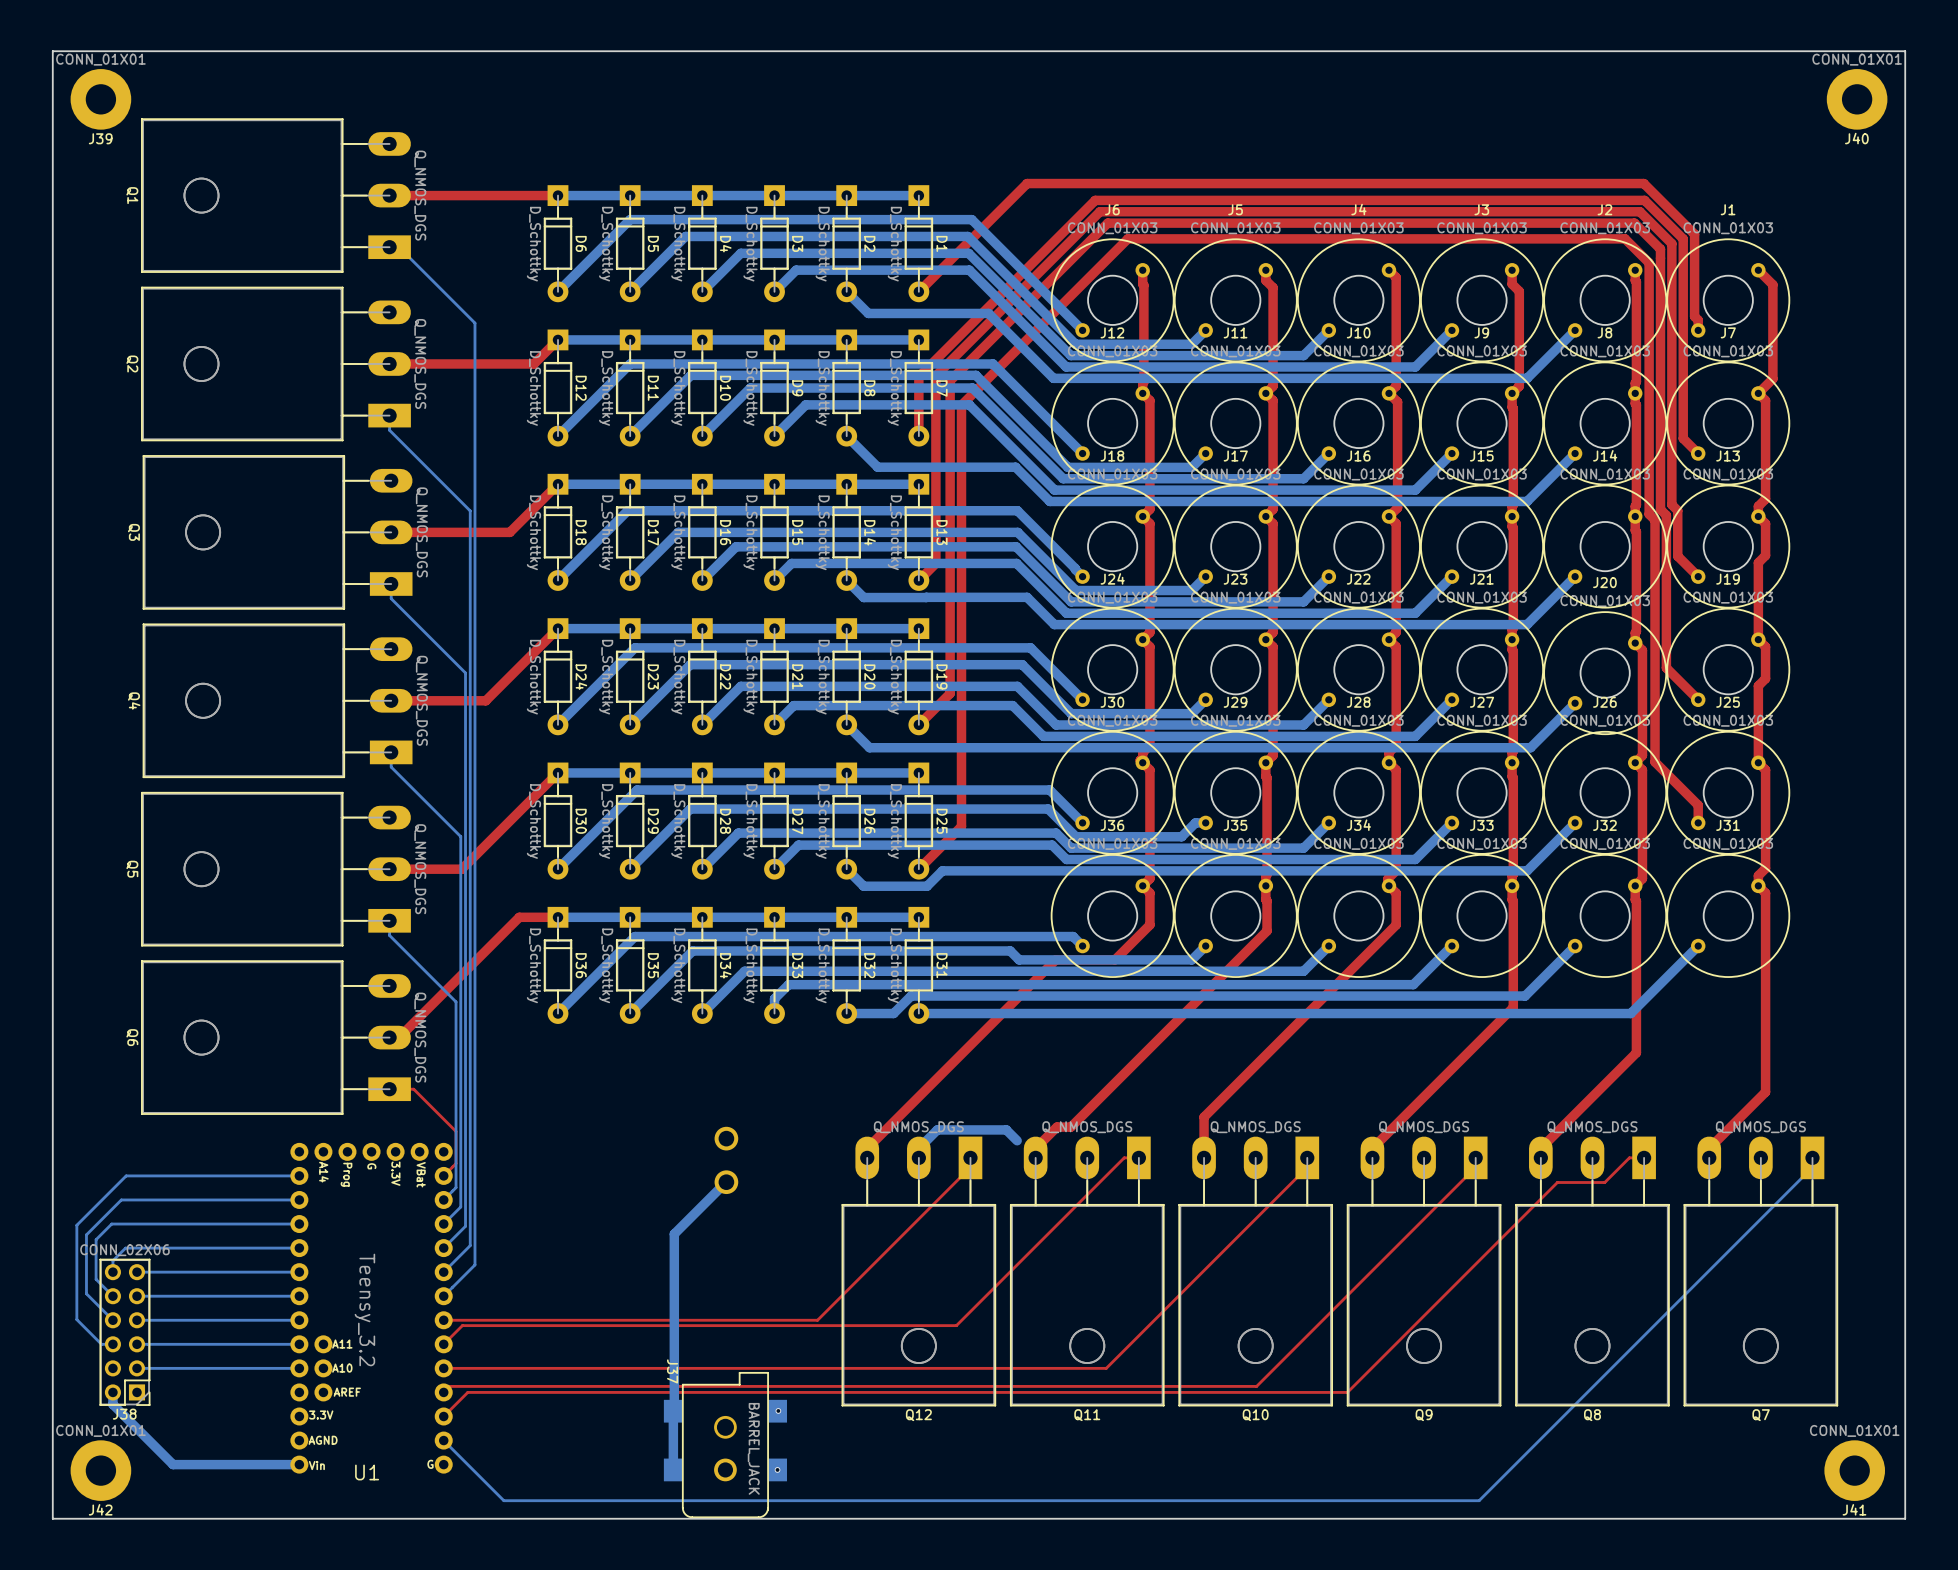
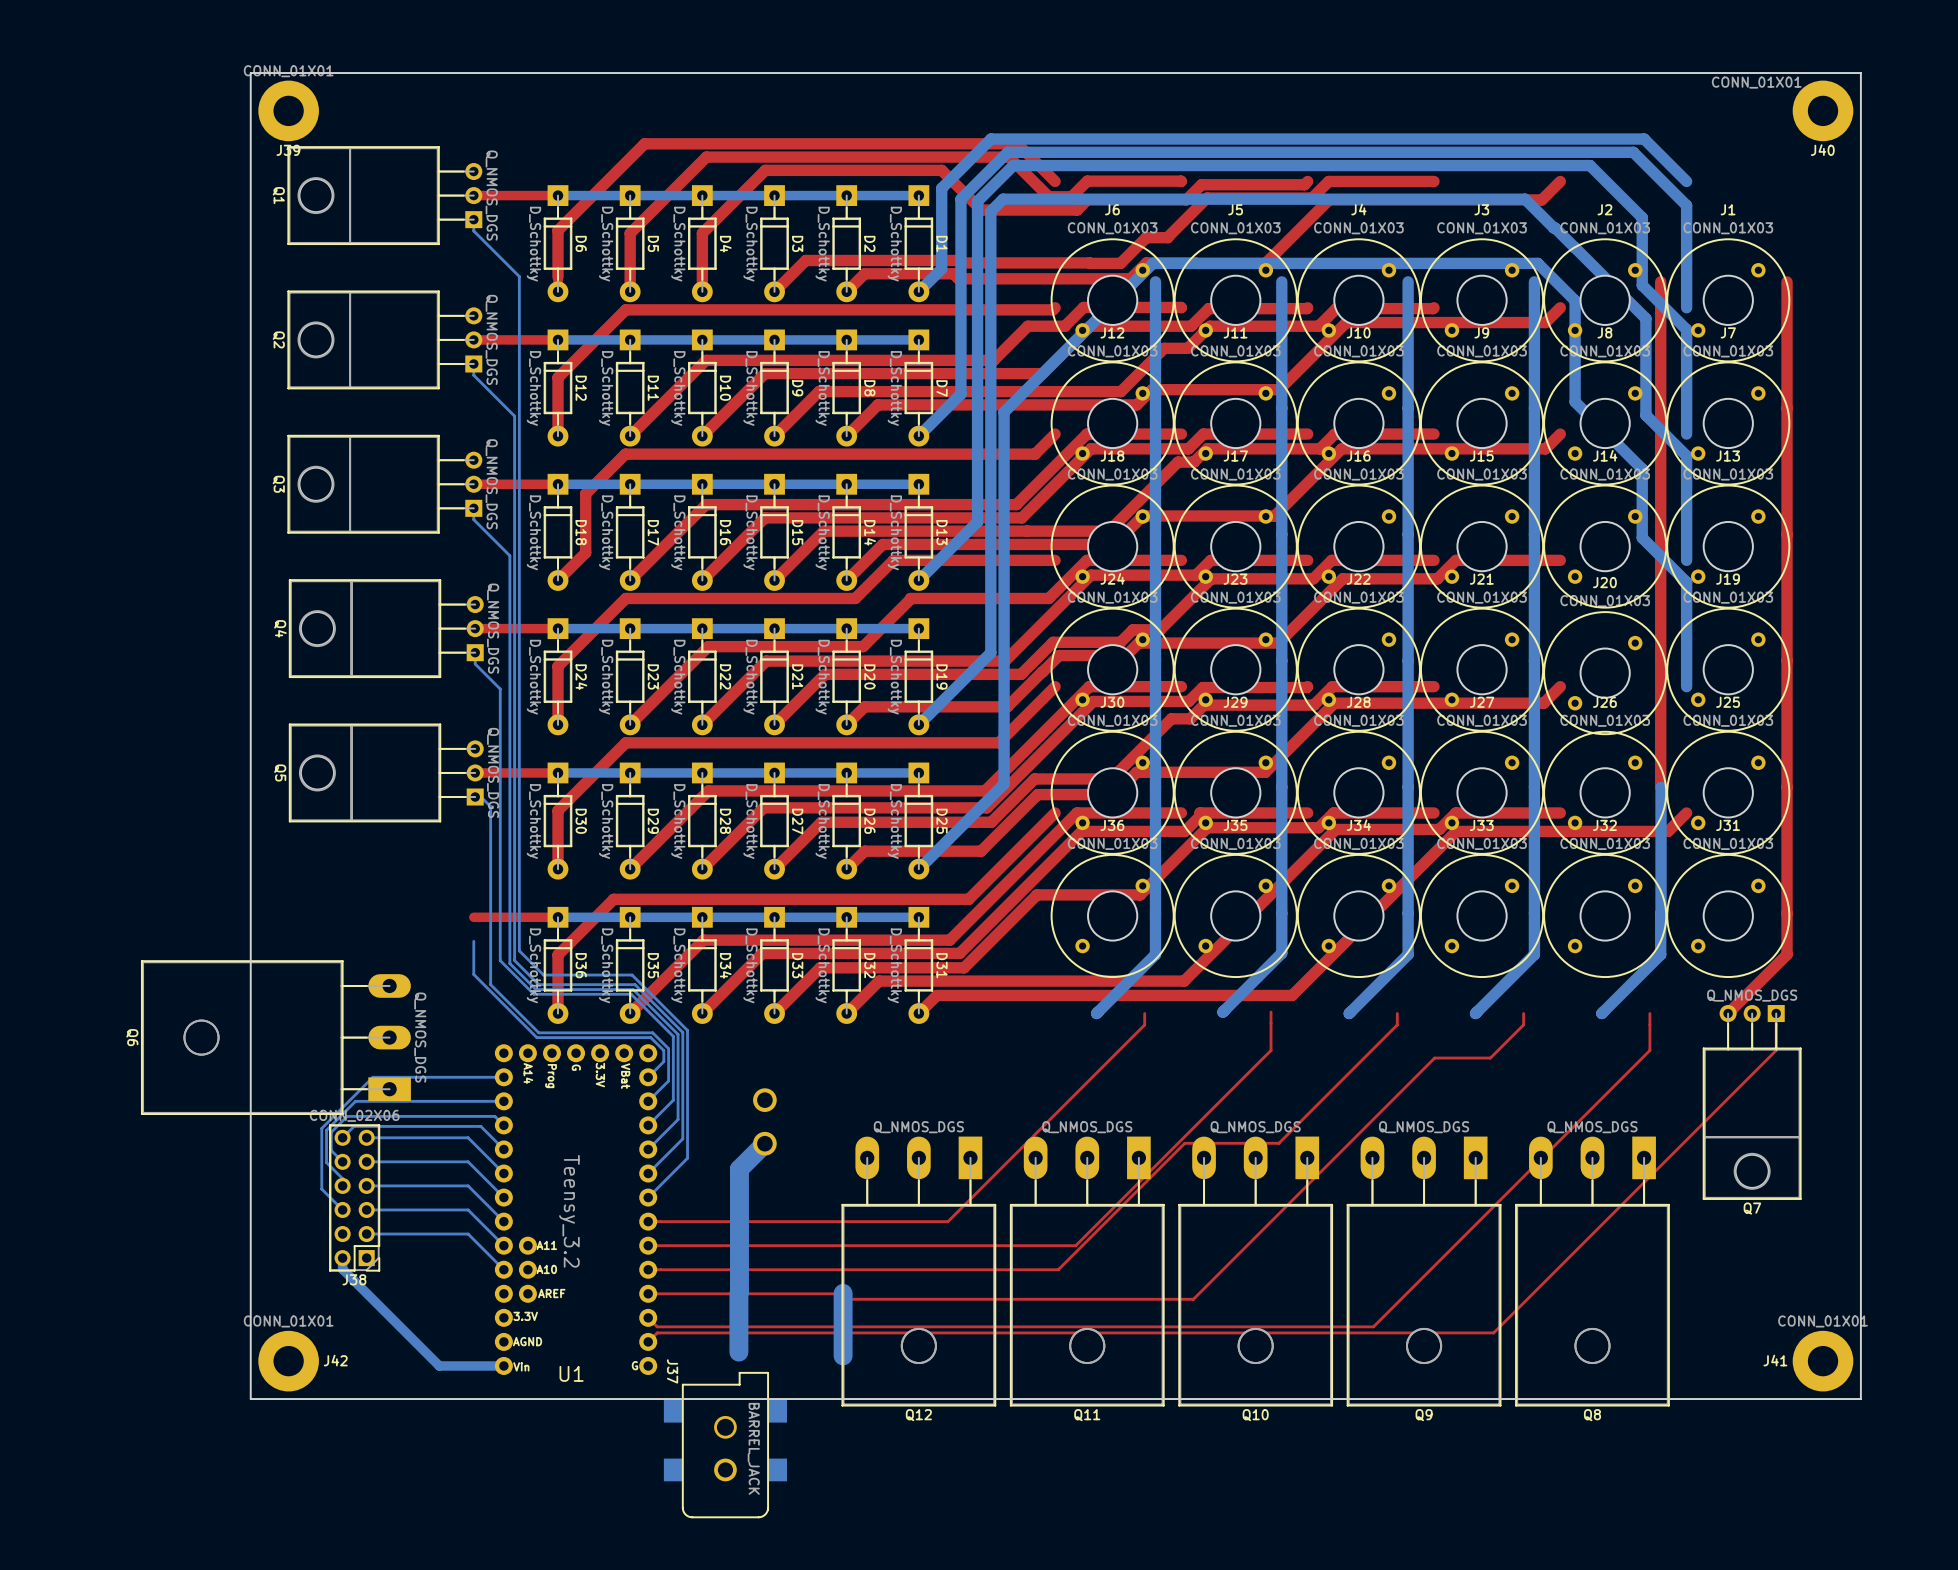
board edge: (1905, 51) (52, 51) (52, 1518) (1905, 1518) (1905, 51) -> (1860, 73) (1860, 1399) (250, 1399) (250, 73) (1860, 73)
J40 value position: CONN_01X01 (1857, 59) -> CONN_01X01 (1756, 82)
J39 position: (100, 99) -> (288, 110)
J40 position: (1857, 99) -> (1823, 110)
Q1 footprint: [141, 118, 411, 273] -> [287, 146, 483, 245]
top track: none -> (1055, 181) (1017, 143) (644, 143) (558, 230) (558, 291)
top track: none -> (1181, 181) (1087, 181) (1071, 196) (1048, 196) (1009, 157) (706, 157) (630, 233) (630, 291)
top track: none -> (1307, 181) (1304, 184) (1201, 184) (1186, 199) (1087, 199) (1077, 210) (981, 210) (941, 170) (765, 170) (702, 233) (702, 291)
top track: none -> (1434, 181) (1328, 181) (1312, 198) (1207, 198) (1167, 237) (1146, 237) (1120, 263) (805, 260) (774, 291)
top track: none -> (1560, 181) (1541, 199) (1329, 199) (1265, 263) (1146, 262) (1130, 278) (958, 278) (953, 273) (864, 273) (846, 291)
bottom track: none -> (1686, 181) (1644, 139) (991, 139) (941, 188) (941, 268) (918, 291)
Q1 name position: Q1 (132, 195) -> Q1 (278, 195)
Q1 value position: Q_NMOS_DGS (420, 195) -> Q_NMOS_DGS (491, 195)
top track: (473, 195) (389, 195) -> none
bottom track: none -> (473, 219) (473, 231) (519, 276) (519, 950) (543, 975) (632, 975) (687, 1030) (687, 1158) (648, 1197)
bottom track: (389, 247) (399, 247) (474, 323) (474, 1264) (443, 1296) -> none
bottom track: none -> (1574, 247) (1525, 199) (1003, 199) (990, 211) (990, 652) (918, 724)
bottom track: none -> (1575, 247) (1645, 318) (1645, 415) (1686, 455) (1686, 560)
top track: (1142, 270) (1142, 393) (1149, 400) (1149, 509) (1142, 516) (1149, 523) (1149, 632) (1142, 639) (1149, 646) (1149, 745) (1142, 752) (1142, 762) -> none
top track: (1265, 270) (1265, 280) (1273, 287) (1273, 386) (1265, 393) (1273, 400) (1273, 509) (1265, 516) (1273, 523) (1273, 632) (1265, 639) (1273, 646) (1273, 755) (1265, 762) (1267, 930) (1070, 1127) (1056, 1127) (1035, 1148) (1035, 1157) -> none
top track: (1388, 270) (1396, 277) (1396, 386) (1388, 393) (1397, 402) (1397, 507) (1388, 516) (1396, 523) (1396, 632) (1388, 639) (1396, 646) (1396, 745) (1388, 752) (1388, 762) (1396, 769) (1396, 870) (1387, 878) (1387, 884) (1396, 893) (1396, 924) (1204, 1117) (1204, 1157) -> none
top track: (1512, 270) (1512, 284) (1519, 291) (1519, 386) (1512, 393) (1513, 1007) (1372, 1148) (1372, 1157) -> none
top track: (1635, 270) (1635, 643) (1642, 650) (1642, 755) (1635, 762) (1642, 769) (1642, 878) (1635, 885) (1636, 1052) (1540, 1148) (1540, 1157) -> none
top track: (1758, 270) (1772, 284) (1772, 378) (1758, 393) (1765, 400) (1765, 499) (1758, 506) (1758, 516) (1765, 523) (1765, 555) (1758, 562) (1758, 639) (1765, 646) (1765, 678) (1758, 685) (1758, 762) (1765, 769) (1765, 868) (1758, 875) (1758, 885) (1765, 893) (1765, 1092) (1709, 1148) (1709, 1157) -> none
bottom track: none -> (1155, 281) (1155, 954) (1096, 1013)
bottom track: none -> (1281, 281) (1281, 953) (1222, 1012)
bottom track: none -> (1408, 281) (1408, 954) (1349, 1013)
bottom track: none -> (1534, 281) (1534, 954) (1475, 1013)
top track: none -> (1660, 281) (1660, 787)
top track: none -> (1787, 281) (1787, 954) (1728, 1013)
Q2 footprint: [141, 286, 411, 441] -> [287, 290, 483, 389]
bottom track: (558, 291) (630, 219) (971, 219) (1082, 330) -> none
bottom track: (630, 291) (685, 236) (967, 236) (1075, 344) (1191, 344) (1205, 330) -> none
bottom track: (702, 291) (740, 253) (968, 253) (1070, 355) (1303, 355) (1328, 330) -> none
bottom track: (774, 291) (796, 270) (969, 270) (1066, 366) (1415, 366) (1451, 330) -> none
bottom track: (846, 291) (868, 313) (988, 313) (1053, 378) (1527, 378) (1575, 330) -> none
top track: (918, 291) (1027, 183) (1643, 183) (1694, 234) (1694, 316) (1698, 320) (1698, 330) -> none
top track: none -> (1055, 307) (1053, 309) (625, 309) (558, 377) (558, 436)
top track: none -> (1181, 307) (1083, 307) (1064, 326) (1027, 326) (993, 360) (705, 360) (630, 436)
top track: none -> (1307, 307) (1208, 308) (1191, 326) (1090, 326) (1042, 373) (764, 373) (702, 436)
top track: none -> (1434, 307) (1336, 308) (1318, 326) (1209, 326) (1187, 348) (1164, 348) (1120, 391) (819, 391) (774, 436)
top track: none -> (1560, 307) (1545, 322) (1347, 321) (1279, 389) (1152, 389) (1136, 404) (877, 404) (846, 436)
bottom track: none -> (1686, 307) (1686, 205) (1633, 152) (1007, 152) (960, 199) (960, 394) (918, 436)
top track: (558, 339) (533, 363) (389, 363) -> (558, 339) (473, 339)
Q2 name position: Q2 (132, 363) -> Q2 (278, 339)
Q2 value position: Q_NMOS_DGS (420, 363) -> Q_NMOS_DGS (491, 339)
bottom track: none -> (473, 363) (473, 375) (514, 416) (514, 960) (538, 984) (635, 984) (682, 1032) (682, 1138) (648, 1173)
bottom track: (389, 415) (389, 430) (470, 510) (470, 1245) (443, 1272) -> none
top track: none -> (1055, 434) (1035, 454) (625, 454) (585, 493) (585, 552) (558, 580)
top track: none -> (1181, 434) (1086, 434) (1016, 504) (706, 504) (630, 580)
top track: none -> (1307, 434) (1203, 434) (1188, 448) (1090, 448) (1021, 517) (764, 517) (702, 580)
top track: none -> (1434, 434) (1334, 434) (1319, 448) (1207, 448) (1194, 462) (1177, 462) (1108, 531) (823, 531) (774, 580)
top track: none -> (1560, 434) (1545, 448) (1341, 448) (1274, 515) (1142, 515) (1114, 544) (882, 544) (846, 580)
bottom track: none -> (1686, 434) (1686, 329) (1642, 285) (1642, 217) (1590, 165) (1013, 165) (977, 201) (977, 521) (918, 580)
bottom track: (558, 436) (630, 363) (993, 363) (1082, 453) -> none
bottom track: (630, 436) (690, 375) (975, 375) (1067, 467) (1191, 467) (1205, 453) -> none
bottom track: (702, 436) (750, 388) (972, 388) (1063, 478) (1303, 478) (1328, 453) -> none
bottom track: (774, 436) (805, 404) (969, 404) (1054, 490) (1415, 490) (1451, 453) -> none
bottom track: (846, 436) (877, 467) (1015, 467) (1049, 501) (1527, 501) (1575, 453) -> none
top track: (918, 436) (918, 376) (1095, 200) (1644, 200) (1683, 238) (1683, 438) (1698, 453) -> none
Q3 footprint: [142, 455, 413, 610] -> [287, 435, 483, 534]
top track: (558, 484) (509, 532) (391, 532) -> (558, 484) (473, 484)
bottom track: none -> (473, 508) (473, 519) (509, 555) (509, 963) (535, 989) (633, 989) (678, 1034) (678, 1119) (648, 1149)
Q3 name position: Q3 (133, 532) -> Q3 (278, 484)
Q3 value position: Q_NMOS_DGS (421, 532) -> Q_NMOS_DGS (491, 484)
top track: none -> (1055, 560) (893, 560) (855, 598) (625, 598) (558, 666) (558, 724)
top track: none -> (1181, 560) (1086, 560) (1048, 598) (910, 598) (863, 646) (708, 646) (630, 724)
top track: none -> (1307, 560) (1210, 560) (1196, 575) (1090, 575) (1004, 661) (766, 661) (702, 724)
top track: none -> (1434, 560) (1331, 560) (1313, 578) (1211, 578) (1160, 629) (1133, 629) (1120, 642) (1053, 642) (1021, 674) (825, 674) (774, 724)
top track: none -> (1560, 560) (1455, 560) (1437, 578) (1342, 578) (1278, 643) (1138, 643) (1126, 655) (1059, 655) (1007, 706) (864, 706) (846, 724)
bottom track: (1082, 576) (1017, 510) (627, 510) (558, 580) -> none
bottom track: (1205, 576) (1191, 590) (1075, 590) (1017, 532) (678, 532) (630, 580) -> none
bottom track: (1328, 576) (1303, 601) (1071, 601) (1016, 546) (736, 546) (702, 580) -> none
bottom track: (1451, 576) (1415, 613) (1066, 613) (1016, 563) (791, 563) (774, 580) -> none
bottom track: (1575, 576) (1527, 624) (1054, 624) (1027, 597) (863, 597) (846, 580) -> none
top track: (1698, 576) (1677, 556) (1677, 510) (1671, 504) (1671, 243) (1639, 211) (1099, 211) (935, 375) (935, 563) (918, 580) -> none
bottom track: (381, 584) (391, 584) (391, 598) (465, 672) (465, 1226) (443, 1248) -> none
Q4 footprint: [142, 623, 413, 778] -> [289, 579, 484, 678]
top track: (558, 628) (485, 700) (391, 700) -> (558, 628) (475, 628)
bottom track: none -> (475, 652) (475, 664) (500, 689) (500, 960) (533, 994) (631, 994) (673, 1036) (673, 1100) (648, 1125)
top track: none -> (1055, 686) (998, 742) (625, 742) (558, 810) (558, 869)
top track: none -> (1181, 686) (1089, 686) (985, 790) (708, 790) (630, 869)
top track: none -> (1307, 686) (1202, 687) (1188, 701) (1093, 701) (986, 807) (763, 807) (702, 869)
top track: none -> (1434, 686) (1332, 686) (1313, 705) (1203, 705) (1190, 718) (1171, 718) (1111, 778) (1034, 778) (991, 822) (821, 822) (774, 869)
top track: none -> (1560, 686) (1543, 703) (1334, 703) (1265, 772) (1136, 772) (1114, 794) (1037, 794) (981, 851) (864, 851) (846, 869)
bottom track: none -> (1686, 686) (1686, 582) (1642, 537) (1642, 469) (1575, 401) (1575, 300) (1537, 263) (1152, 263) (1004, 412) (1004, 783) (918, 869)
bottom track: (1082, 699) (1030, 647) (634, 647) (558, 724) -> none
bottom track: (1205, 699) (1191, 713) (1071, 713) (1022, 664) (690, 664) (630, 724) -> none
bottom track: (1328, 699) (1303, 725) (1056, 725) (1017, 686) (740, 686) (702, 724) -> none
bottom track: (1451, 699) (1415, 736) (1043, 736) (1012, 705) (793, 705) (774, 724) -> none
top track: (1698, 699) (1666, 667) (1666, 515) (1660, 509) (1660, 249) (1634, 223) (1107, 223) (950, 380) (950, 693) (918, 724) -> none
Q4 value position: Q_NMOS_DGS (421, 700) -> Q_NMOS_DGS (493, 628)
Q4 name position: Q4 (134, 701) -> Q4 (280, 628)
bottom track: (1575, 703) (1530, 747) (869, 747) (846, 724) -> none
bottom track: (381, 752) (391, 752) (391, 767) (460, 836) (460, 1206) (443, 1224) -> none
top track: (1140, 760) (1149, 769) (1149, 878) (1142, 885) (1149, 893) (1149, 924) (1114, 959) (1055, 959) (867, 1148) (867, 1157) -> none
top track: (558, 772) (461, 869) (389, 869) -> (558, 772) (475, 772)
bottom track: none -> (1661, 787) (1661, 913)
Q5 footprint: [141, 792, 411, 947] -> [289, 723, 484, 823]
bottom track: none -> (475, 797) (476, 792) (490, 806) (490, 984) (538, 1032) (652, 1032) (668, 1048) (668, 1080) (648, 1101)
top track: none -> (1055, 812) (968, 899) (613, 899) (558, 955) (558, 1013)
top track: none -> (1181, 812) (1077, 812) (949, 940) (703, 940) (630, 1013)
top track: none -> (1307, 812) (1200, 812) (1200, 816) (1184, 831) (1081, 831) (959, 953) (762, 953) (702, 1013)
top track: none -> (1434, 812) (1333, 812) (1318, 827) (1207, 827) (1140, 894) (1037, 894) (964, 967) (820, 967) (774, 1013)
top track: none -> (1560, 812) (1455, 812) (1439, 829) (1335, 829) (1184, 981) (879, 981) (846, 1013)
top track: none -> (1686, 812) (1668, 831) (1456, 831) (1292, 995) (936, 995) (918, 1013)
bottom track: (1082, 822) (1049, 790) (637, 790) (558, 869) -> none
bottom track: (1205, 822) (1195, 822) (1181, 836) (1075, 836) (1048, 809) (690, 809) (630, 869) -> none
bottom track: (1328, 822) (1303, 848) (1071, 848) (1056, 833) (738, 833) (702, 869) -> none
bottom track: (1451, 822) (1415, 859) (1066, 859) (1052, 845) (798, 845) (774, 869) -> none
bottom track: (1575, 822) (1527, 870) (942, 870) (927, 886) (863, 886) (846, 869) -> none
top track: (1698, 822) (1698, 805) (1655, 762) (1655, 520) (1649, 514) (1649, 262) (1625, 238) (1127, 238) (961, 405) (961, 826) (918, 869) -> none
Q5 name position: Q5 (132, 869) -> Q5 (280, 772)
Q5 value position: Q_NMOS_DGS (420, 869) -> Q_NMOS_DGS (493, 772)
bottom track: none -> (1660, 913) (1660, 954) (1601, 1013)
top track: (519, 917) (399, 1037) (389, 1037) -> (519, 917) (473, 917)
bottom track: (389, 920) (389, 935) (456, 1001) (456, 1187) (443, 1199) -> none
bottom track: none -> (473, 941) (473, 974) (536, 1037) (650, 1037) (663, 1050) (663, 1061) (648, 1077)
bottom track: (1082, 946) (1073, 936) (634, 936) (558, 1013) -> none
bottom track: (1205, 946) (1191, 959) (1019, 959) (1010, 950) (692, 950) (630, 1013) -> none
bottom track: (1328, 946) (1303, 971) (744, 971) (702, 1013) -> none
bottom track: (1451, 946) (1413, 984) (788, 984) (774, 998) (774, 1013) -> none
bottom track: (1575, 946) (1525, 996) (911, 996) (893, 1013) (846, 1013) -> none
bottom track: (1698, 946) (1630, 1013) (918, 1013) -> none
top track: none -> (1271, 1012) (1271, 1050) (1075, 1245) (648, 1245)
top track: none -> (1144, 1013) (1144, 1024) (947, 1221) (648, 1221)
top track: none -> (1397, 1013) (1397, 1024) (1278, 1143) (1184, 1143) (1058, 1269) (648, 1269)
top track: none -> (1523, 1013) (1523, 1024) (1490, 1058) (1434, 1058) (1193, 1299) (840, 1299) (835, 1293) (648, 1293)
top track: none -> (1649, 1013) (1649, 1050) (1373, 1326) (657, 1326) (648, 1317)
top track: none -> (1776, 1013) (1776, 1050) (1493, 1332) (657, 1332) (648, 1341)
bottom track: none -> (503, 1077) (372, 1077) (321, 1128) (321, 1189) (342, 1209)
top track: (389, 1089) (413, 1089) (456, 1131) (456, 1163) (443, 1175) -> none
bottom track: none -> (503, 1101) (355, 1101) (326, 1130) (326, 1162) (342, 1178) (342, 1185)
bottom track: none -> (503, 1125) (494, 1116) (347, 1116) (331, 1132) (331, 1150) (342, 1161)
Q7 value position: Q_NMOS_DGS (1760, 1127) -> Q_NMOS_DGS (1752, 995)
Q7 footprint: [1683, 1136, 1838, 1407] -> [1703, 1005, 1802, 1200]
bottom track: none -> (342, 1137) (353, 1126) (480, 1126) (503, 1149)
bottom track: none -> (366, 1137) (468, 1137) (503, 1173)
bottom track: (1017, 1140) (1006, 1129) (937, 1129) (918, 1148) (918, 1157) -> none
bottom track: none -> (764, 1143) (739, 1169) (739, 1291)
top track: (970, 1157) (970, 1167) (817, 1320) (443, 1320) -> none
top track: (1138, 1157) (1124, 1157) (956, 1325) (462, 1325) (443, 1344) -> none
top track: (1307, 1157) (1307, 1167) (1106, 1368) (443, 1368) -> none
top track: (1475, 1157) (1475, 1167) (1256, 1386) (449, 1386) (443, 1392) -> none
top track: (1644, 1157) (1629, 1157) (1604, 1182) (1557, 1182) (1347, 1392) (467, 1392) (443, 1416) -> none
bottom track: (1812, 1157) (1812, 1167) (1479, 1500) (503, 1500) (443, 1440) -> none
part position: (726, 1160) -> (764, 1121)
bottom track: none -> (366, 1161) (468, 1161) (503, 1197)
bottom track: (299, 1175) (126, 1175) (76, 1225) (76, 1319) (101, 1344) (112, 1344) -> none
bottom track: (726, 1181) (674, 1234) (674, 1410) -> none
bottom track: none -> (366, 1185) (468, 1185) (503, 1221)
bottom track: (299, 1199) (121, 1199) (86, 1234) (86, 1293) (112, 1320) -> none
bottom track: none -> (366, 1209) (468, 1209) (503, 1245)
bottom track: (299, 1224) (111, 1224) (96, 1239) (96, 1279) (112, 1296) -> none
bottom track: none -> (366, 1234) (468, 1234) (503, 1269)
bottom track: (299, 1248) (125, 1248) (112, 1260) (112, 1272) -> none
bottom track: none -> (342, 1258) (342, 1269) (439, 1365) (503, 1365)
bottom track: (299, 1272) (136, 1272) -> none
bottom track: none -> (843, 1293) (843, 1355) (843, 1351)
bottom track: (299, 1296) (136, 1296) -> none
U1 position: (371, 1308) -> (576, 1209)
bottom track: (299, 1320) (136, 1320) -> none
J38 position: (124, 1332) -> (354, 1197)
bottom track: (299, 1344) (136, 1344) -> none
bottom track: (299, 1368) (136, 1368) -> none
bottom track: (112, 1392) (112, 1404) (173, 1464) (299, 1464) -> none
via: (778, 1410) -> none
bottom track: (673, 1411) (673, 1469) -> (738, 1293) (738, 1352)
Q7 name position: Q7 (1761, 1415) -> Q7 (1752, 1208)
via: (777, 1469) -> none
J42 position: (100, 1470) -> (288, 1361)
J41 position: (1854, 1470) -> (1823, 1361)
J42 name position: J42 (100, 1509) -> J42 (335, 1360)
J41 name position: J41 (1854, 1509) -> J41 (1775, 1360)

